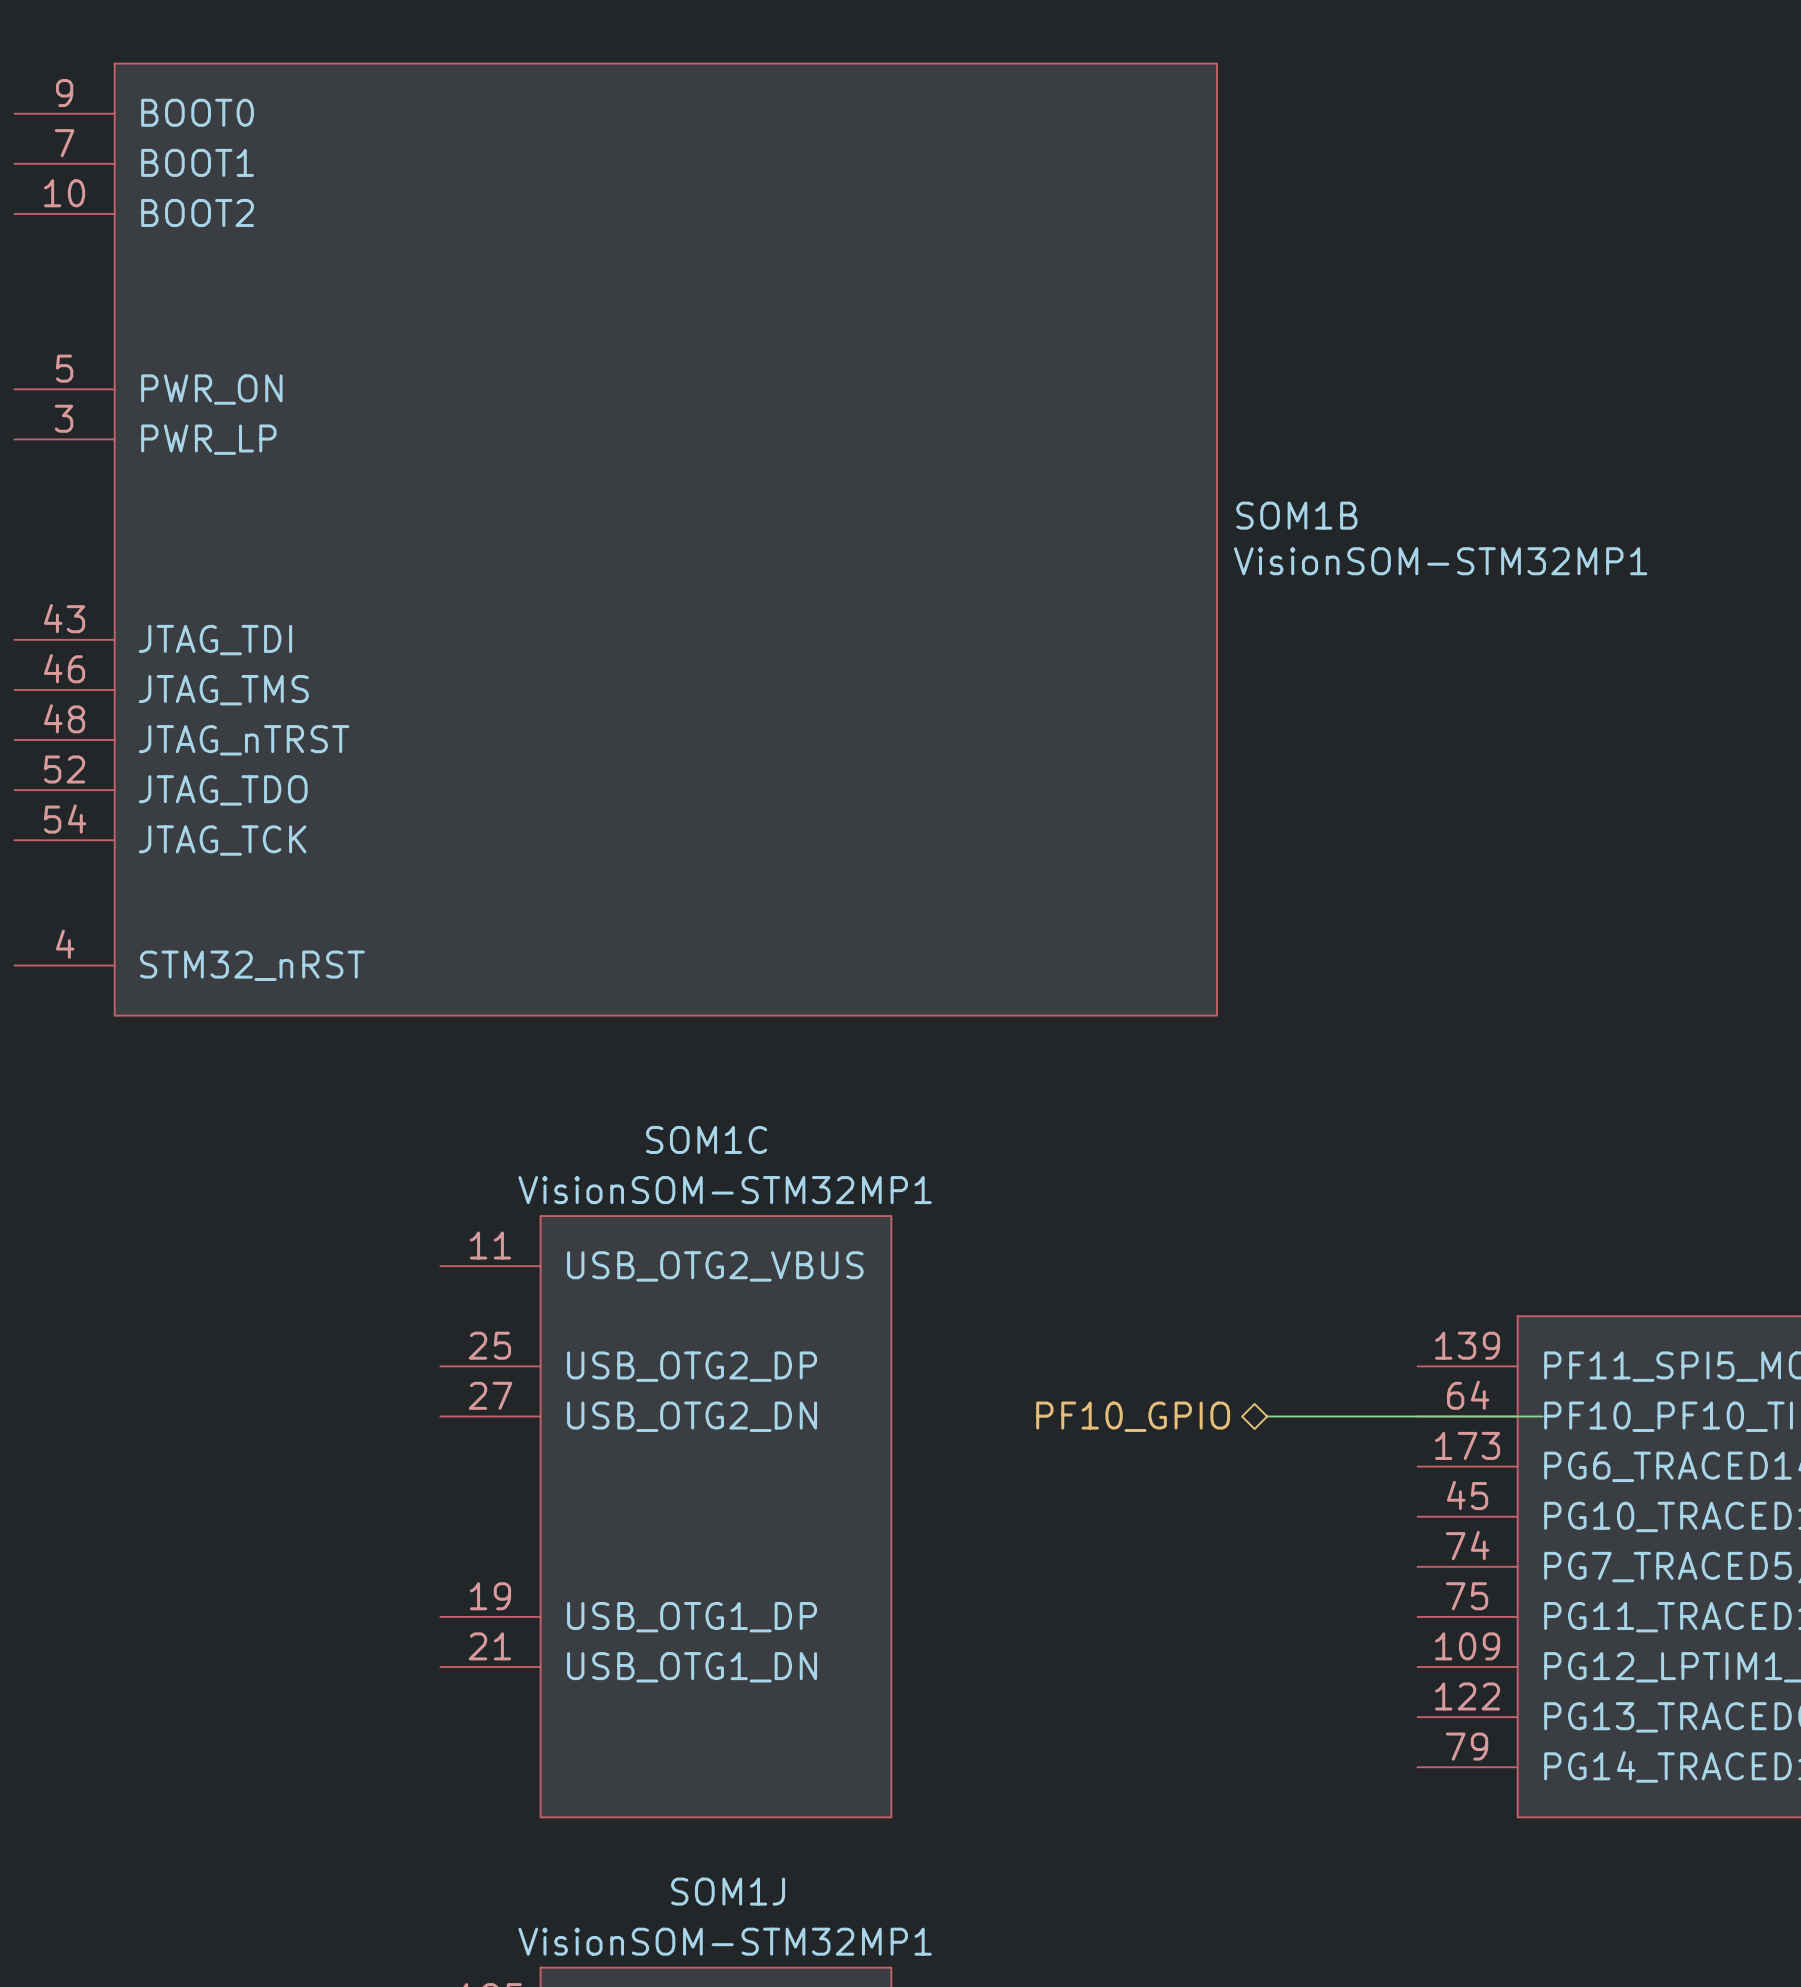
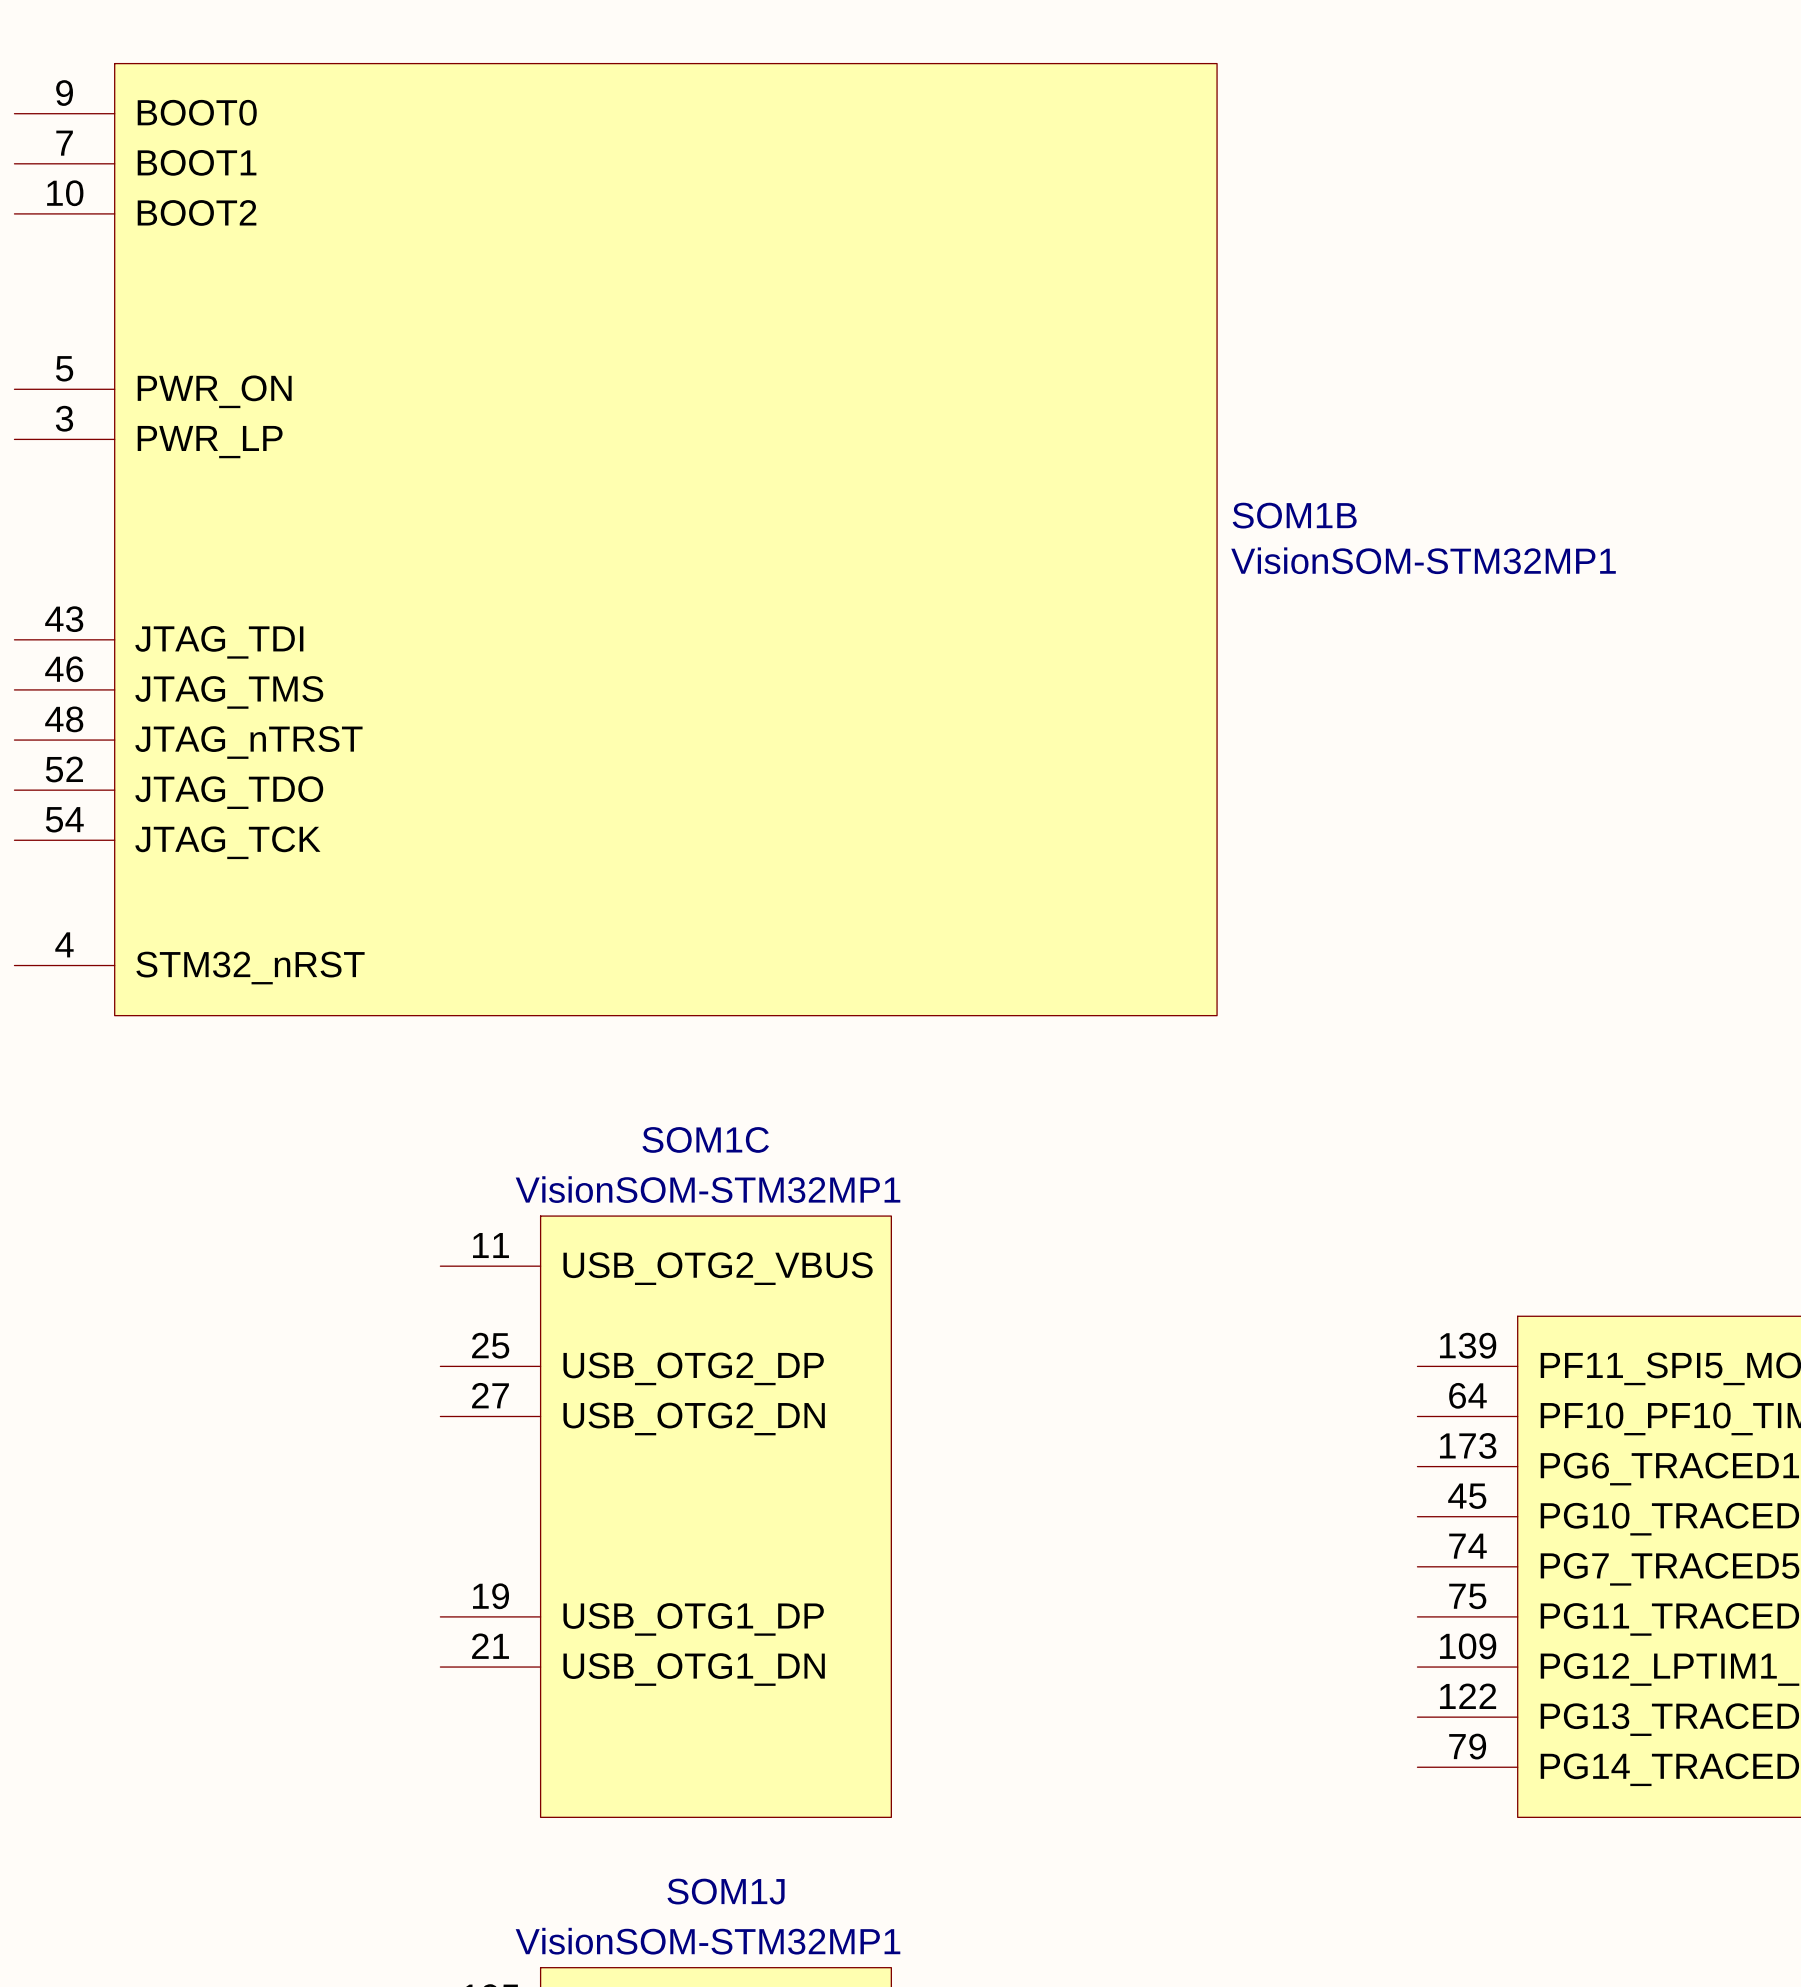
hierarchical label: PF10_GPIO (1133, 1416) -> none
wire: (1267, 1416) (1542, 1416) -> none

